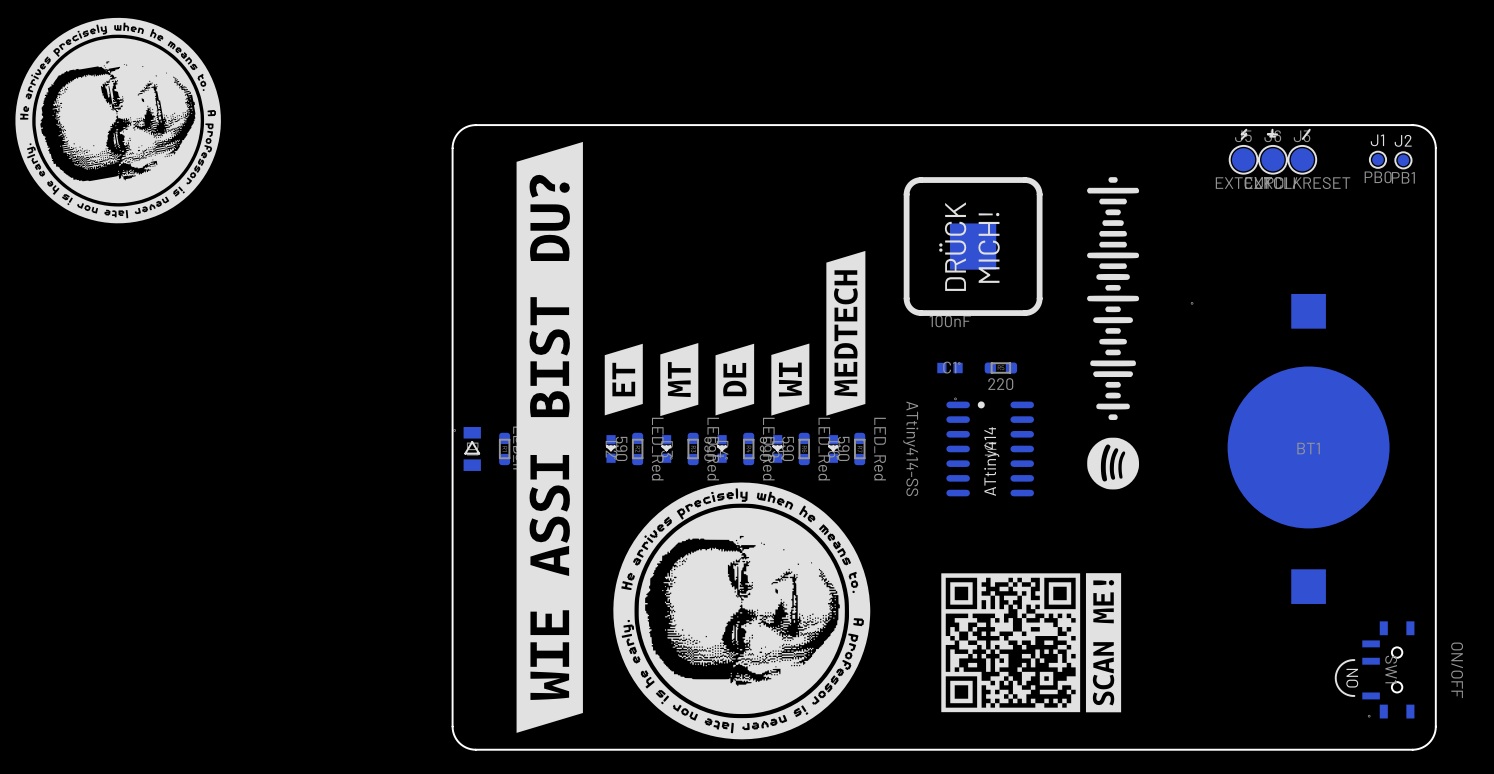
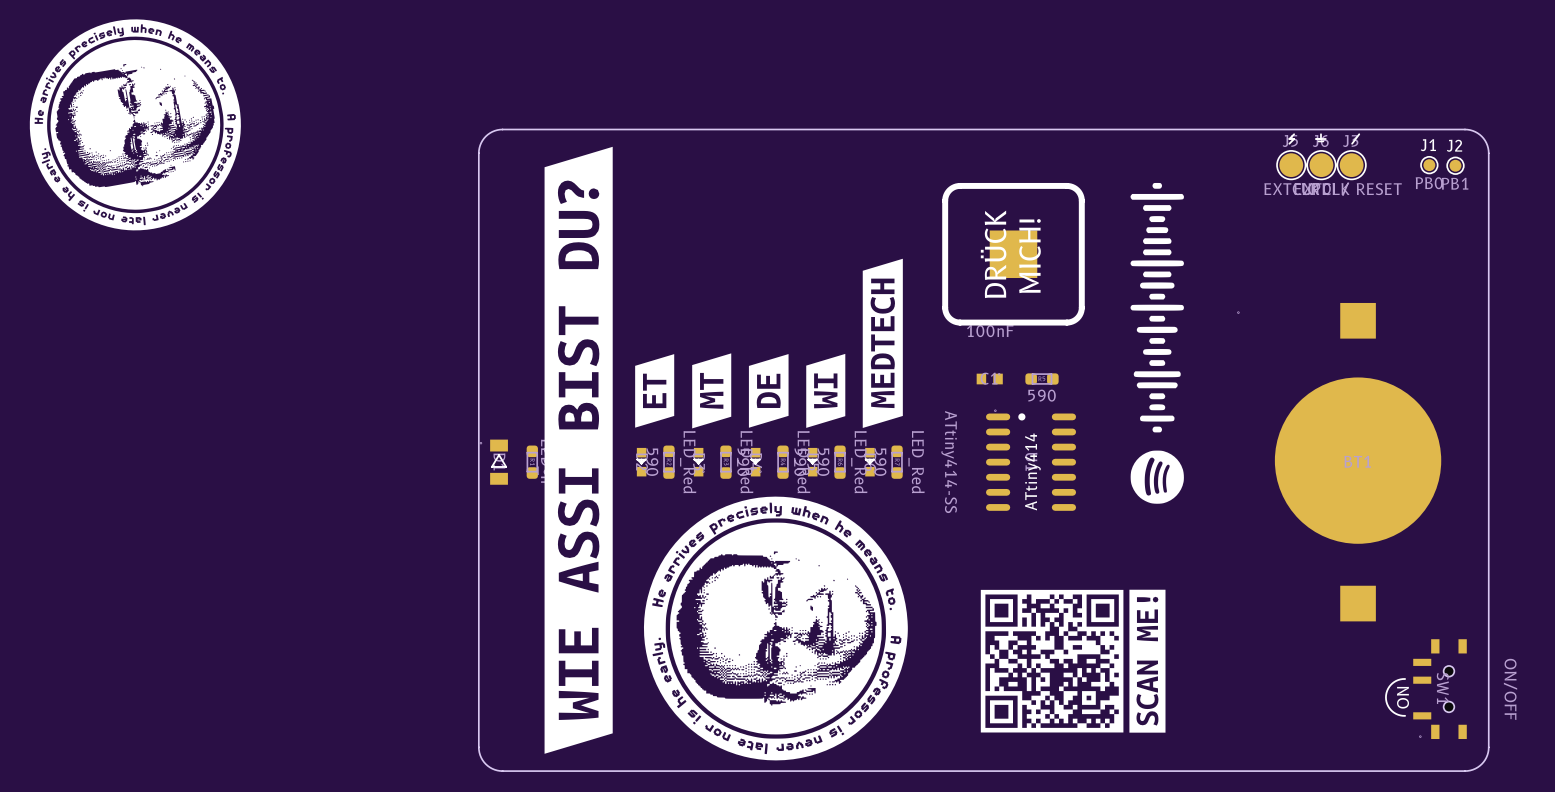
part value: 220 (1000, 384) -> 590 (1042, 395)

